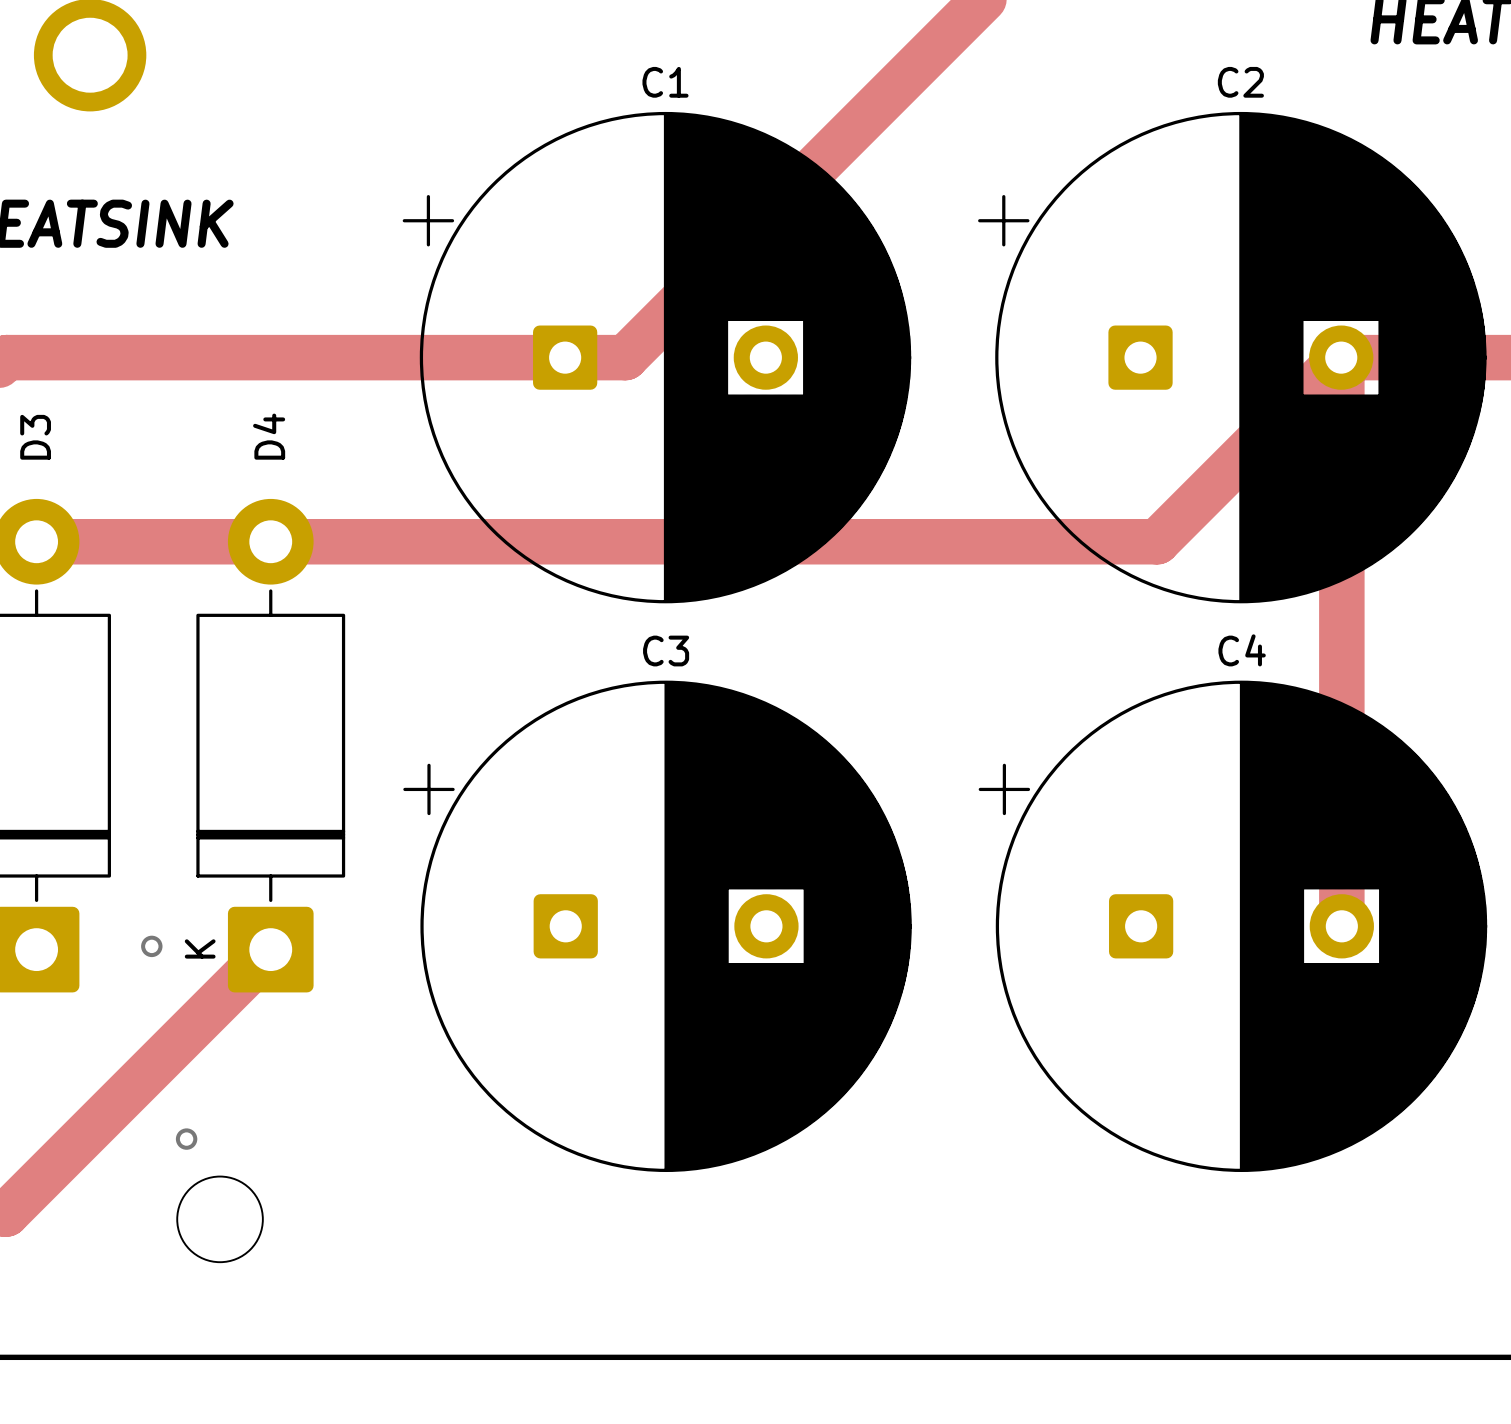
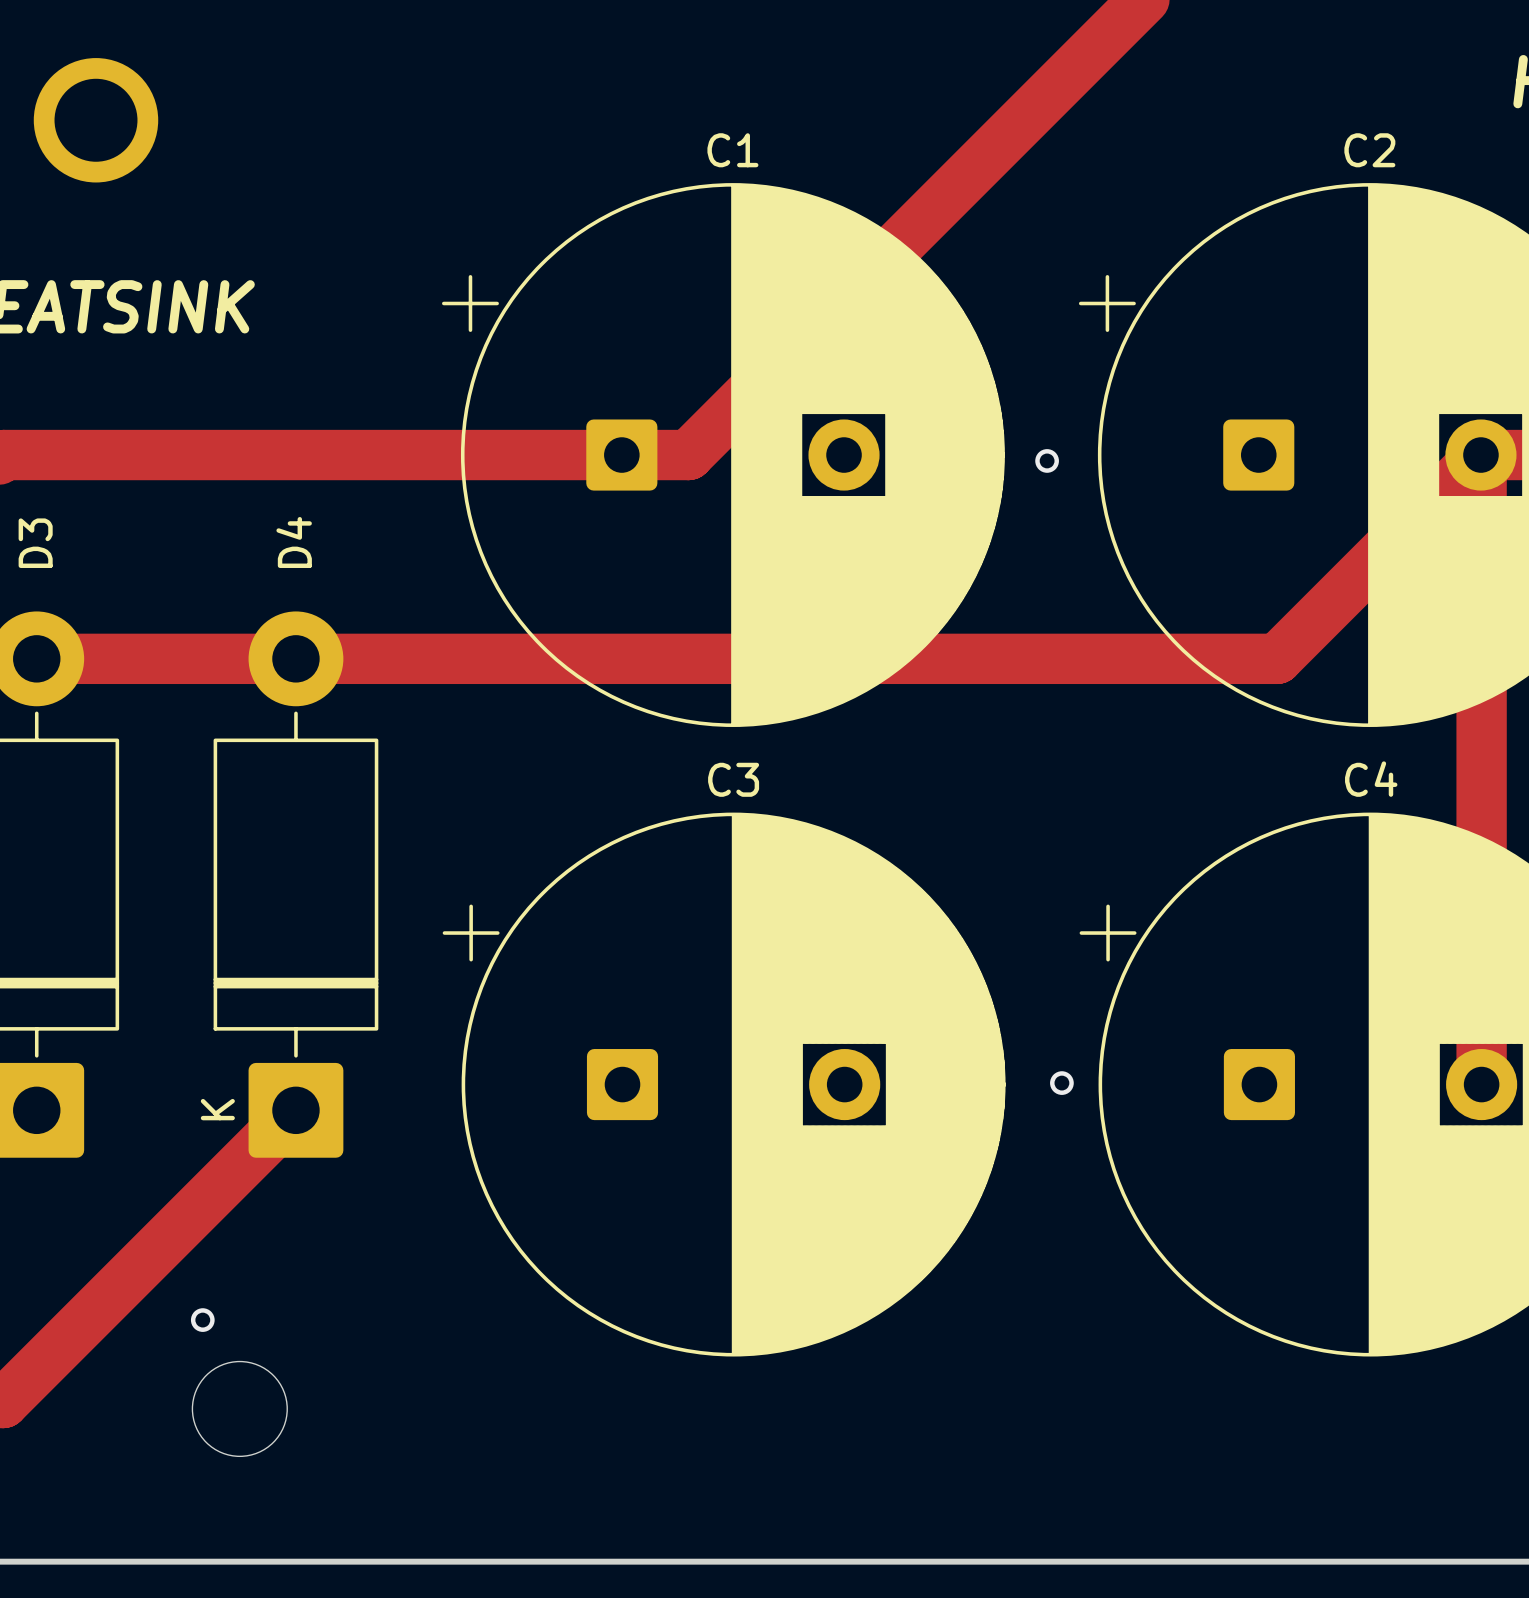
via: none -> (1047, 460)
via: none -> (1061, 1083)
via: (151, 946) -> none

